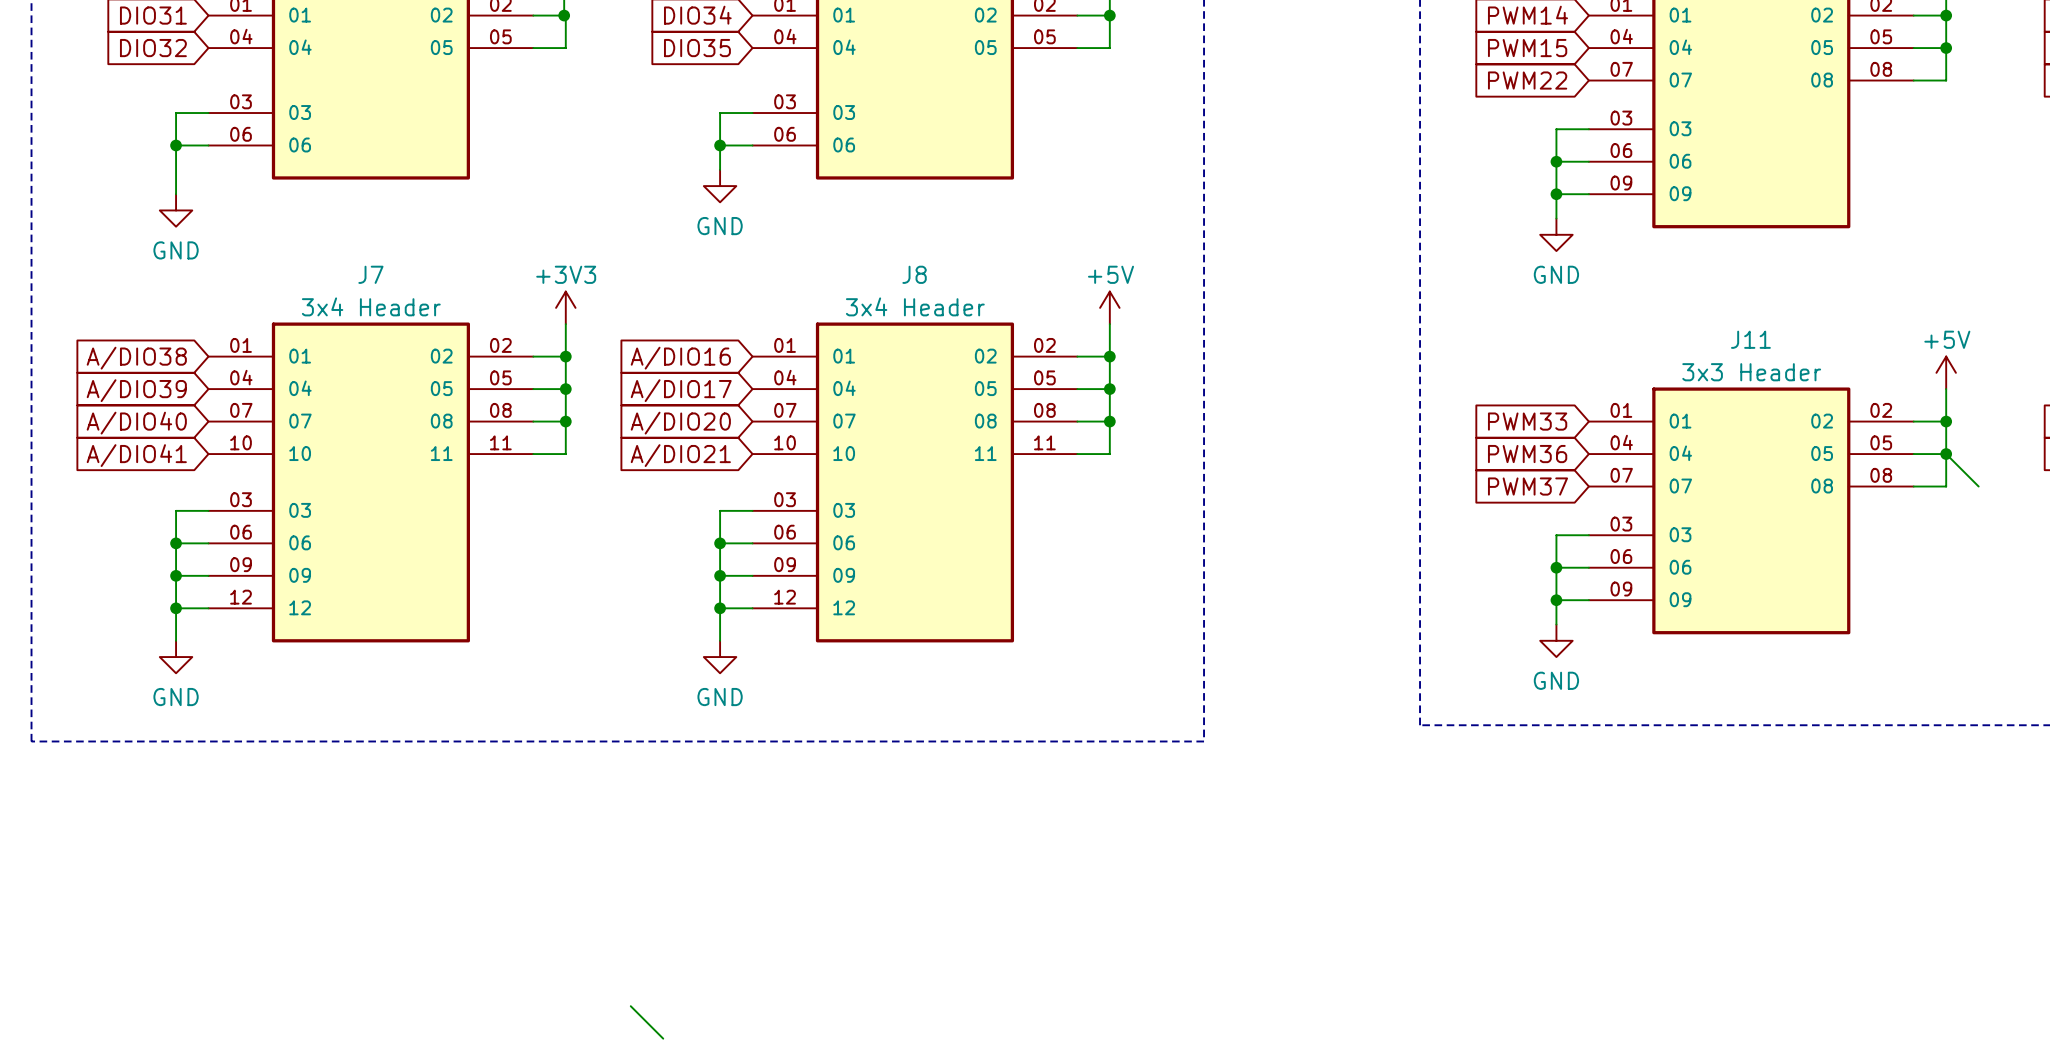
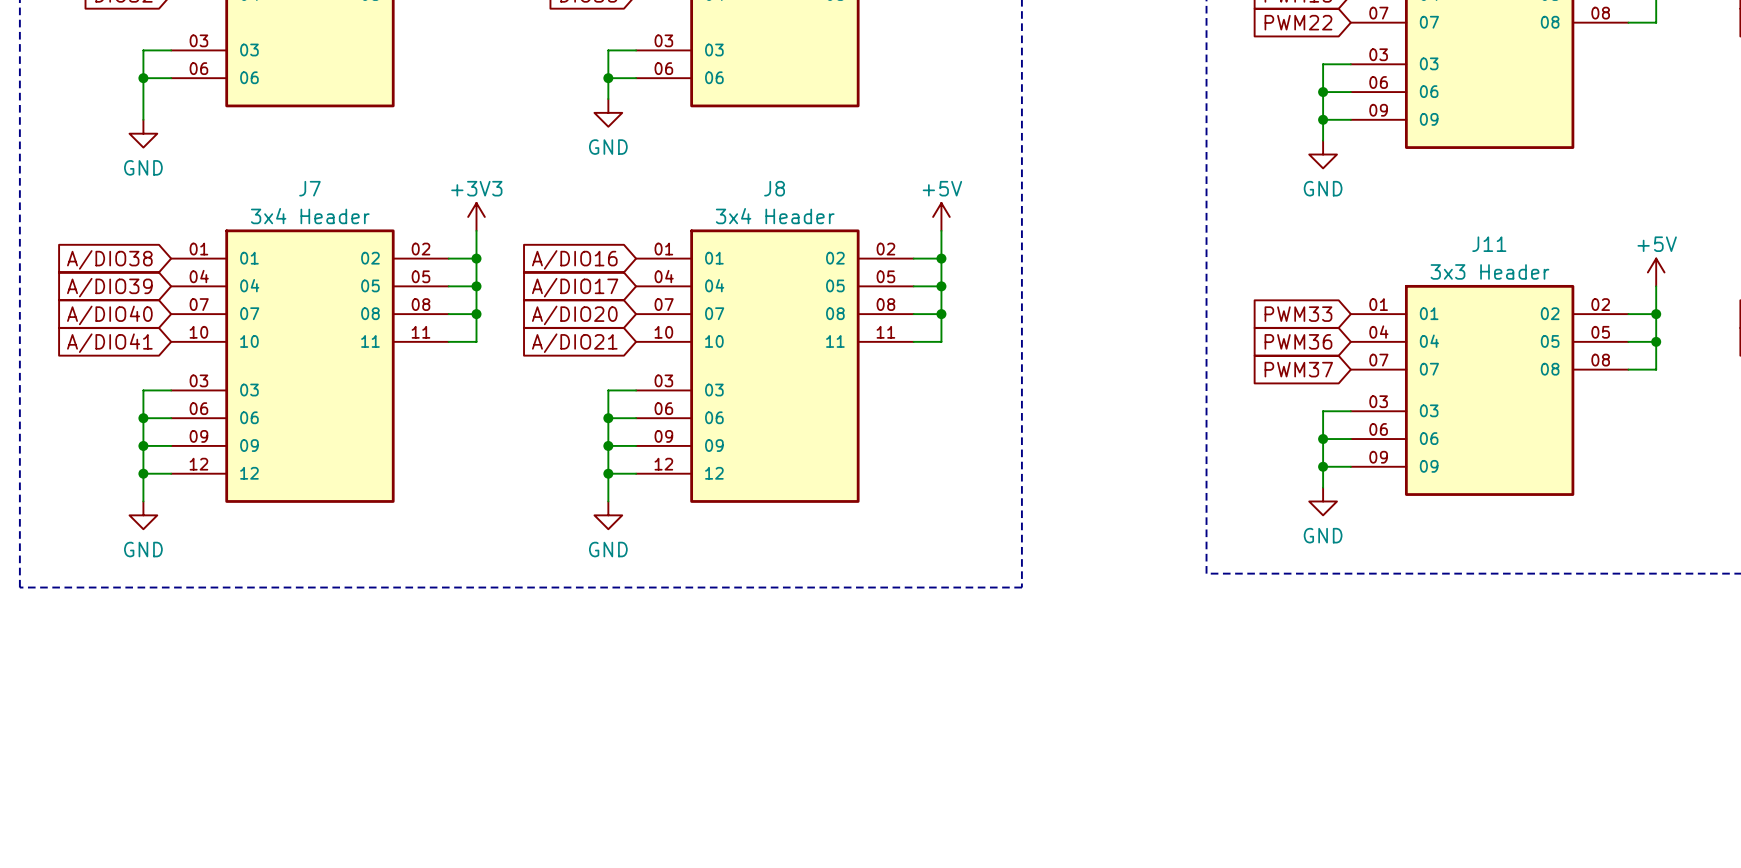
wire: (1946, 454) (1978, 486) -> none
wire: (630, 1006) (663, 1038) -> none

